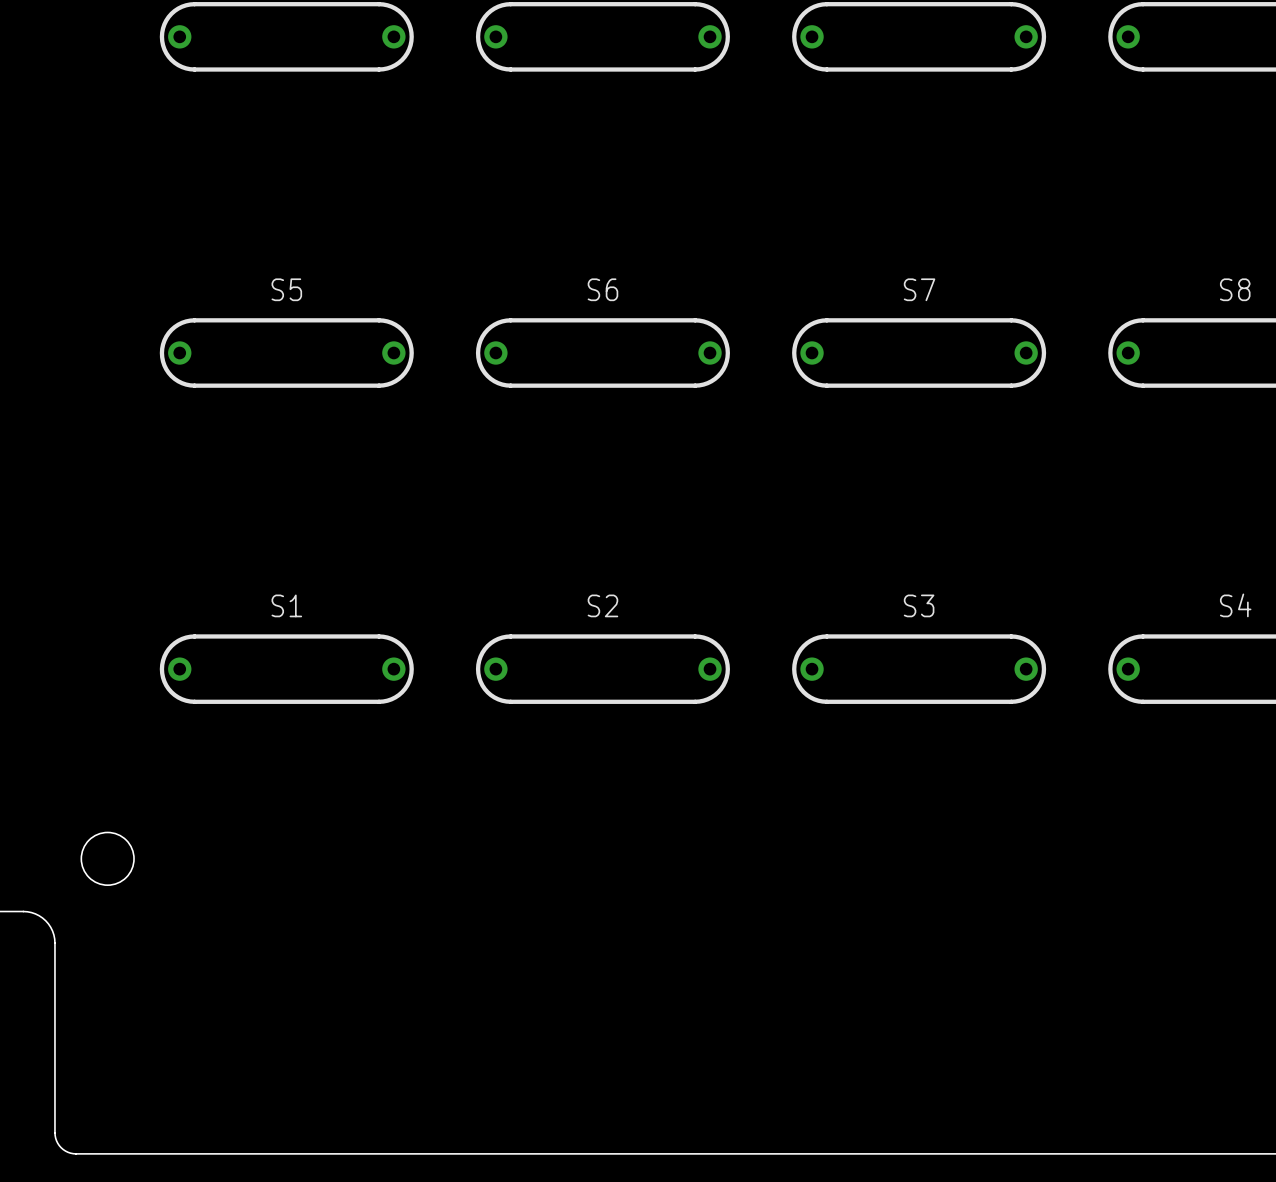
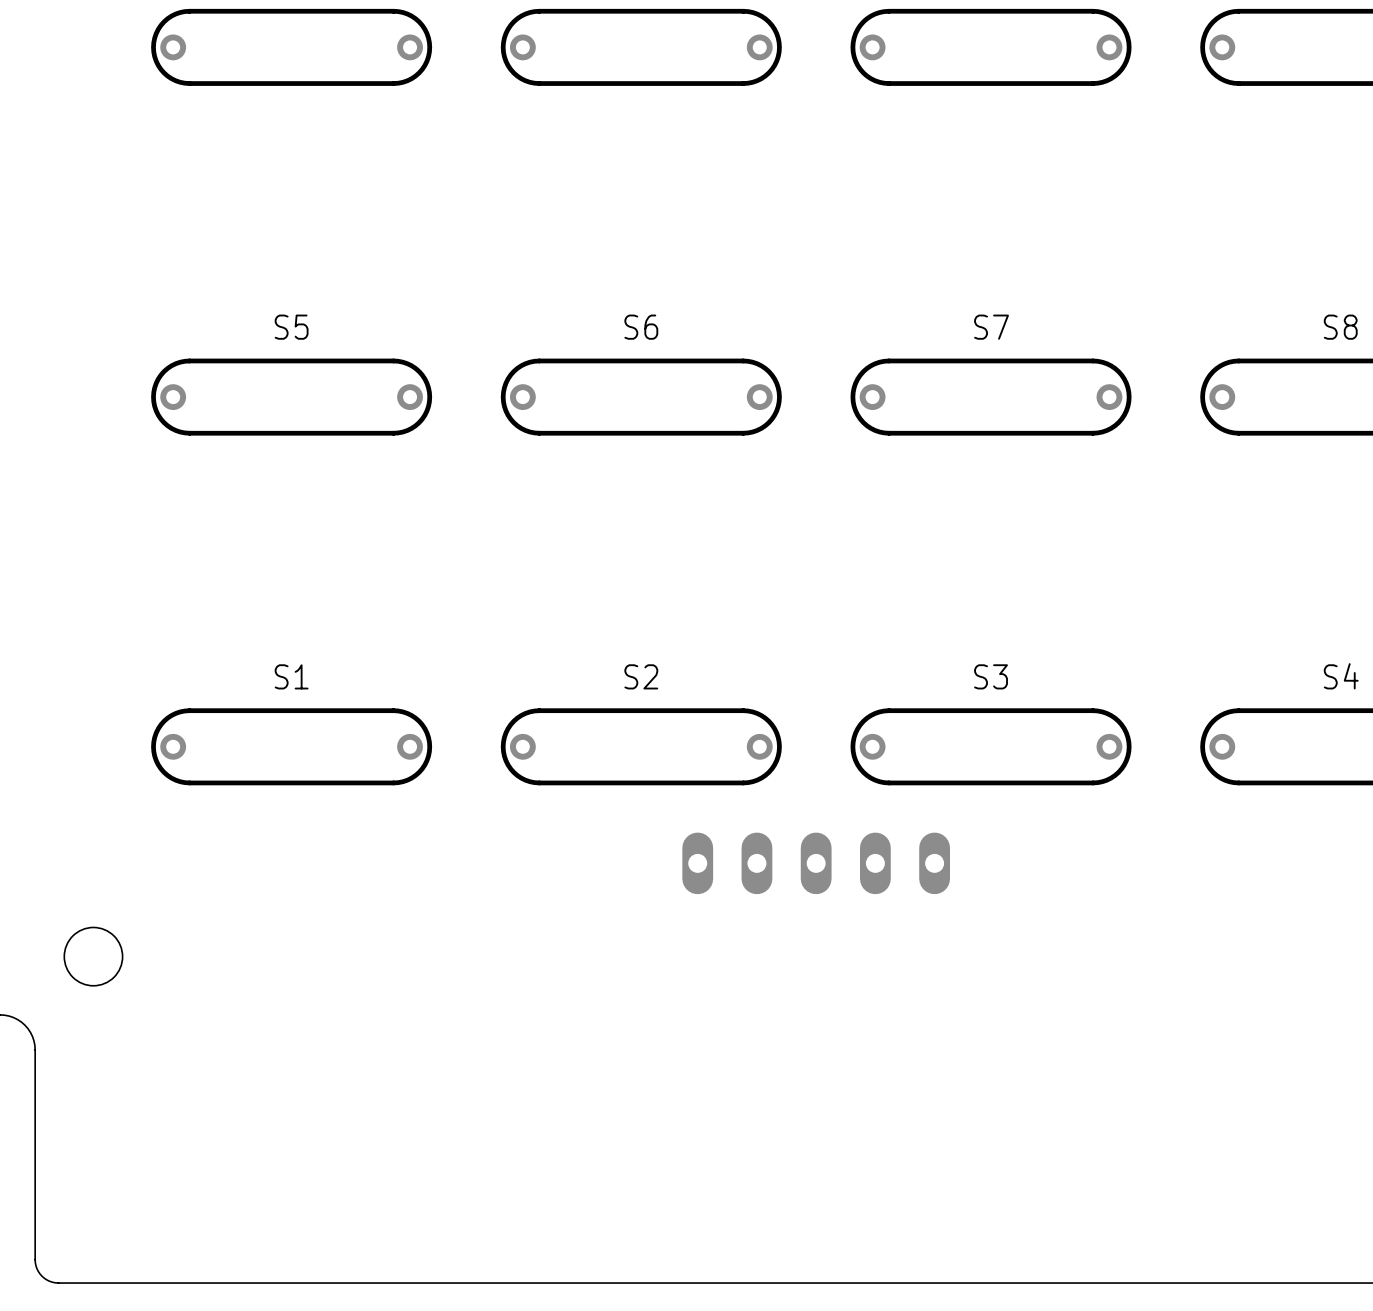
part: none -> (816, 863)

